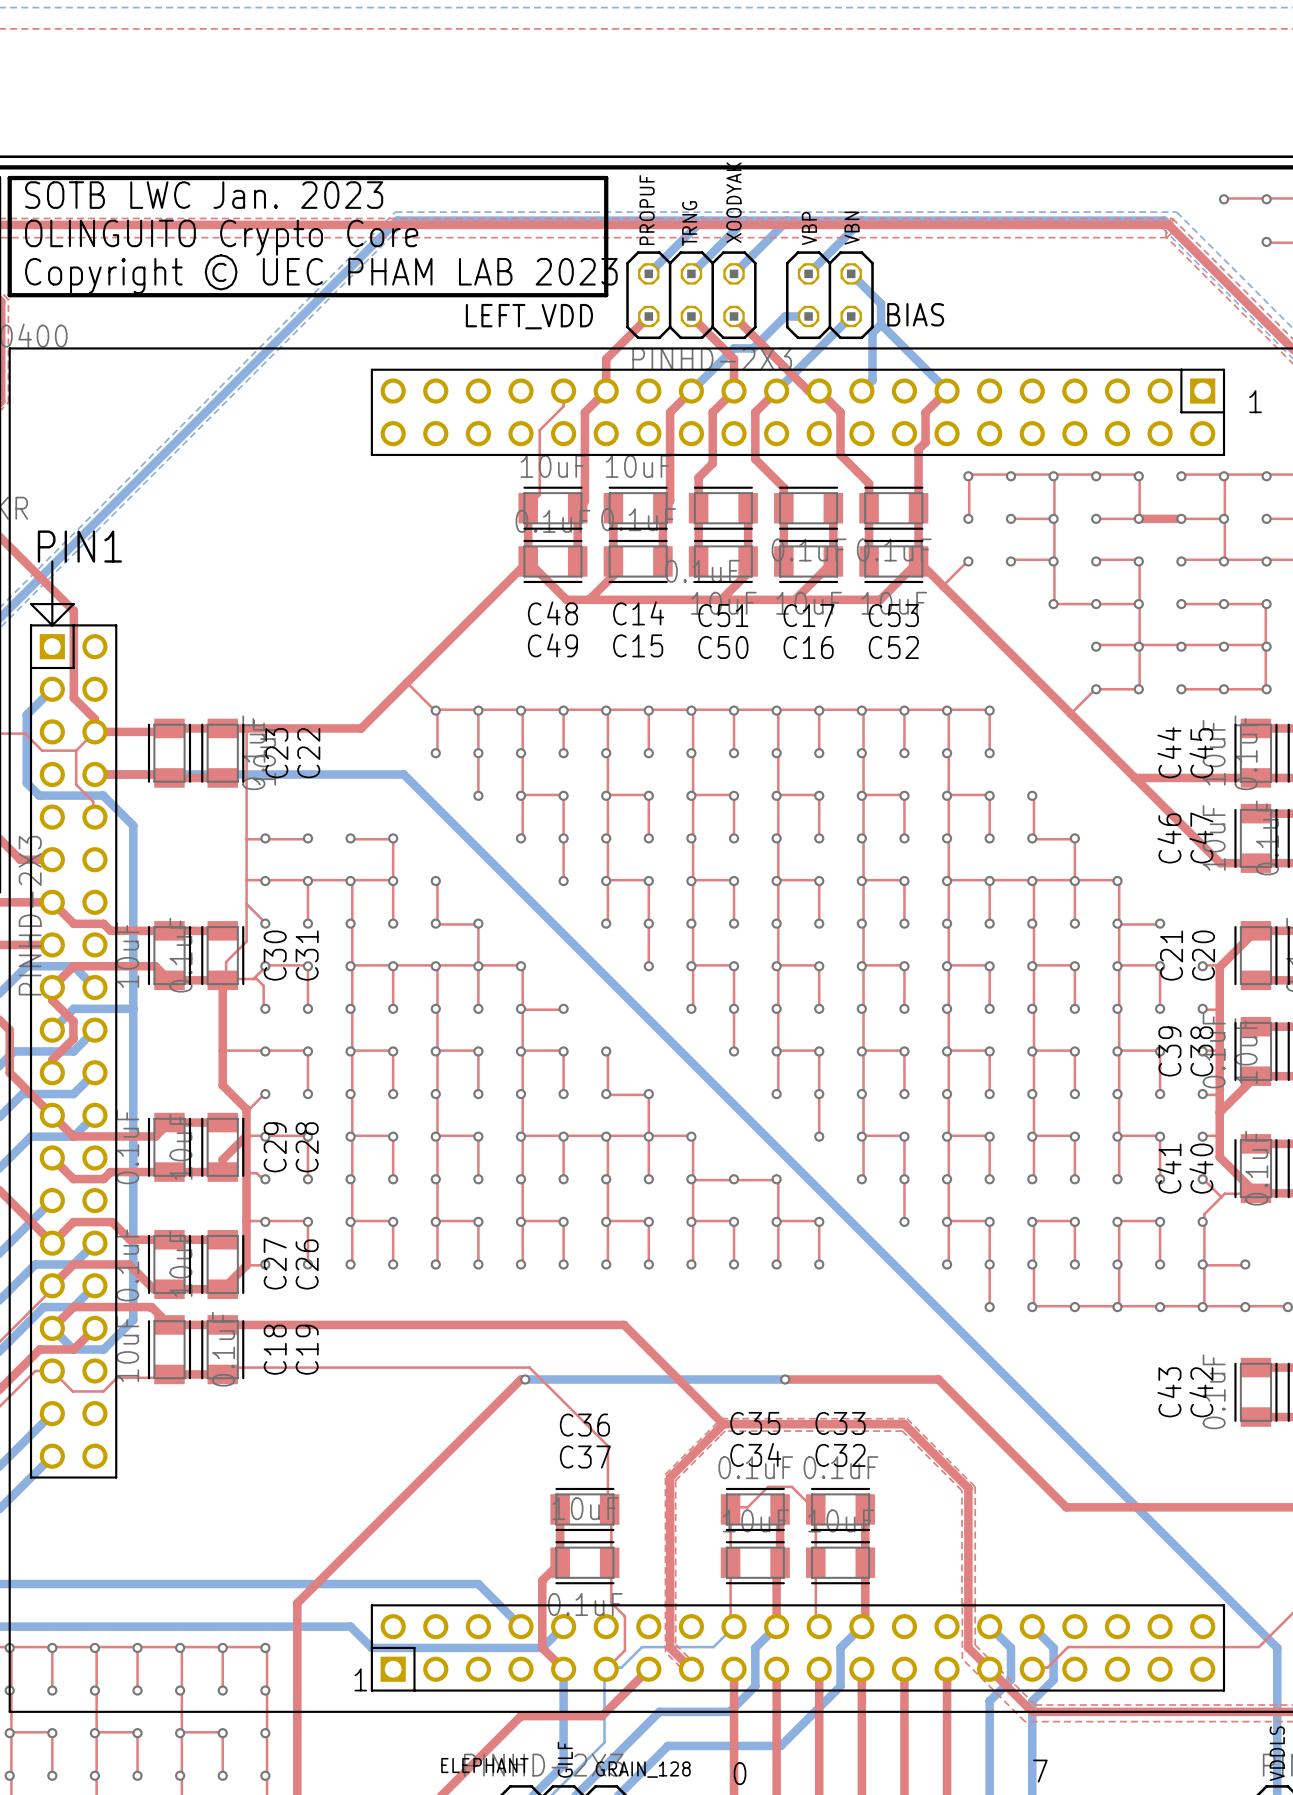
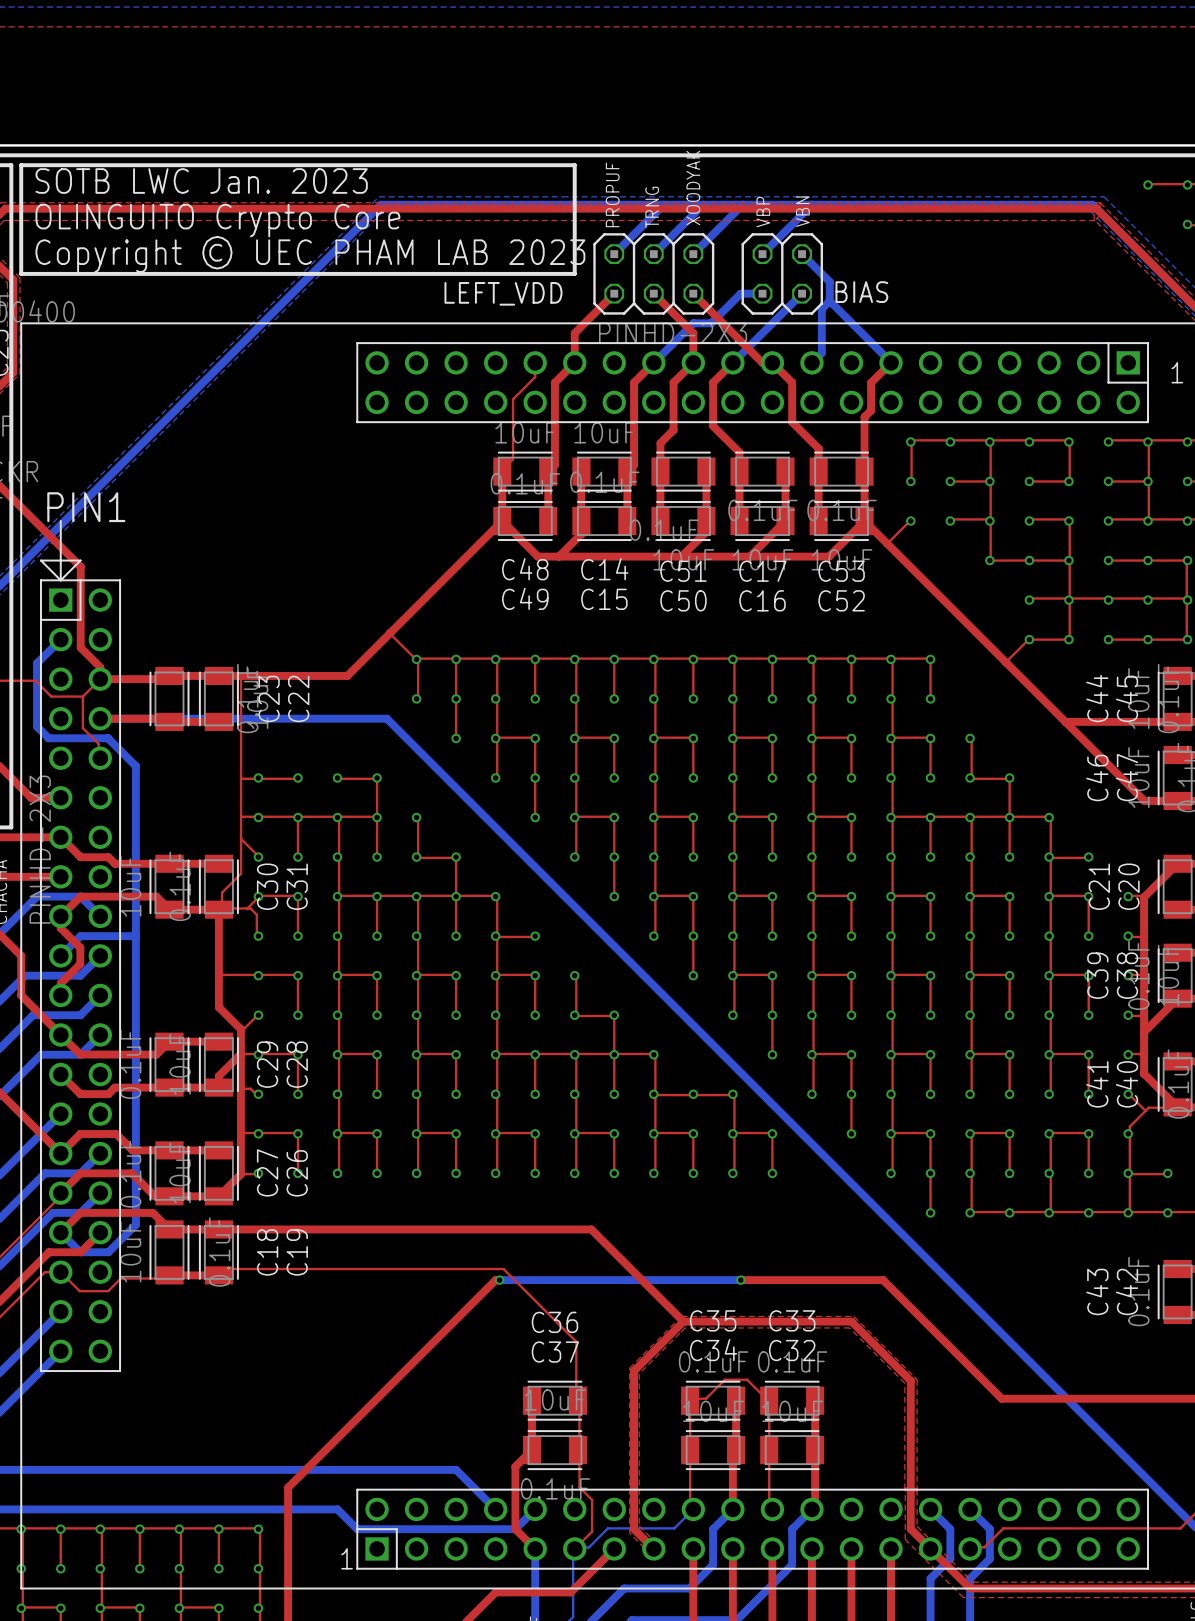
top track: (1139, 518) (1181, 518) -> none

